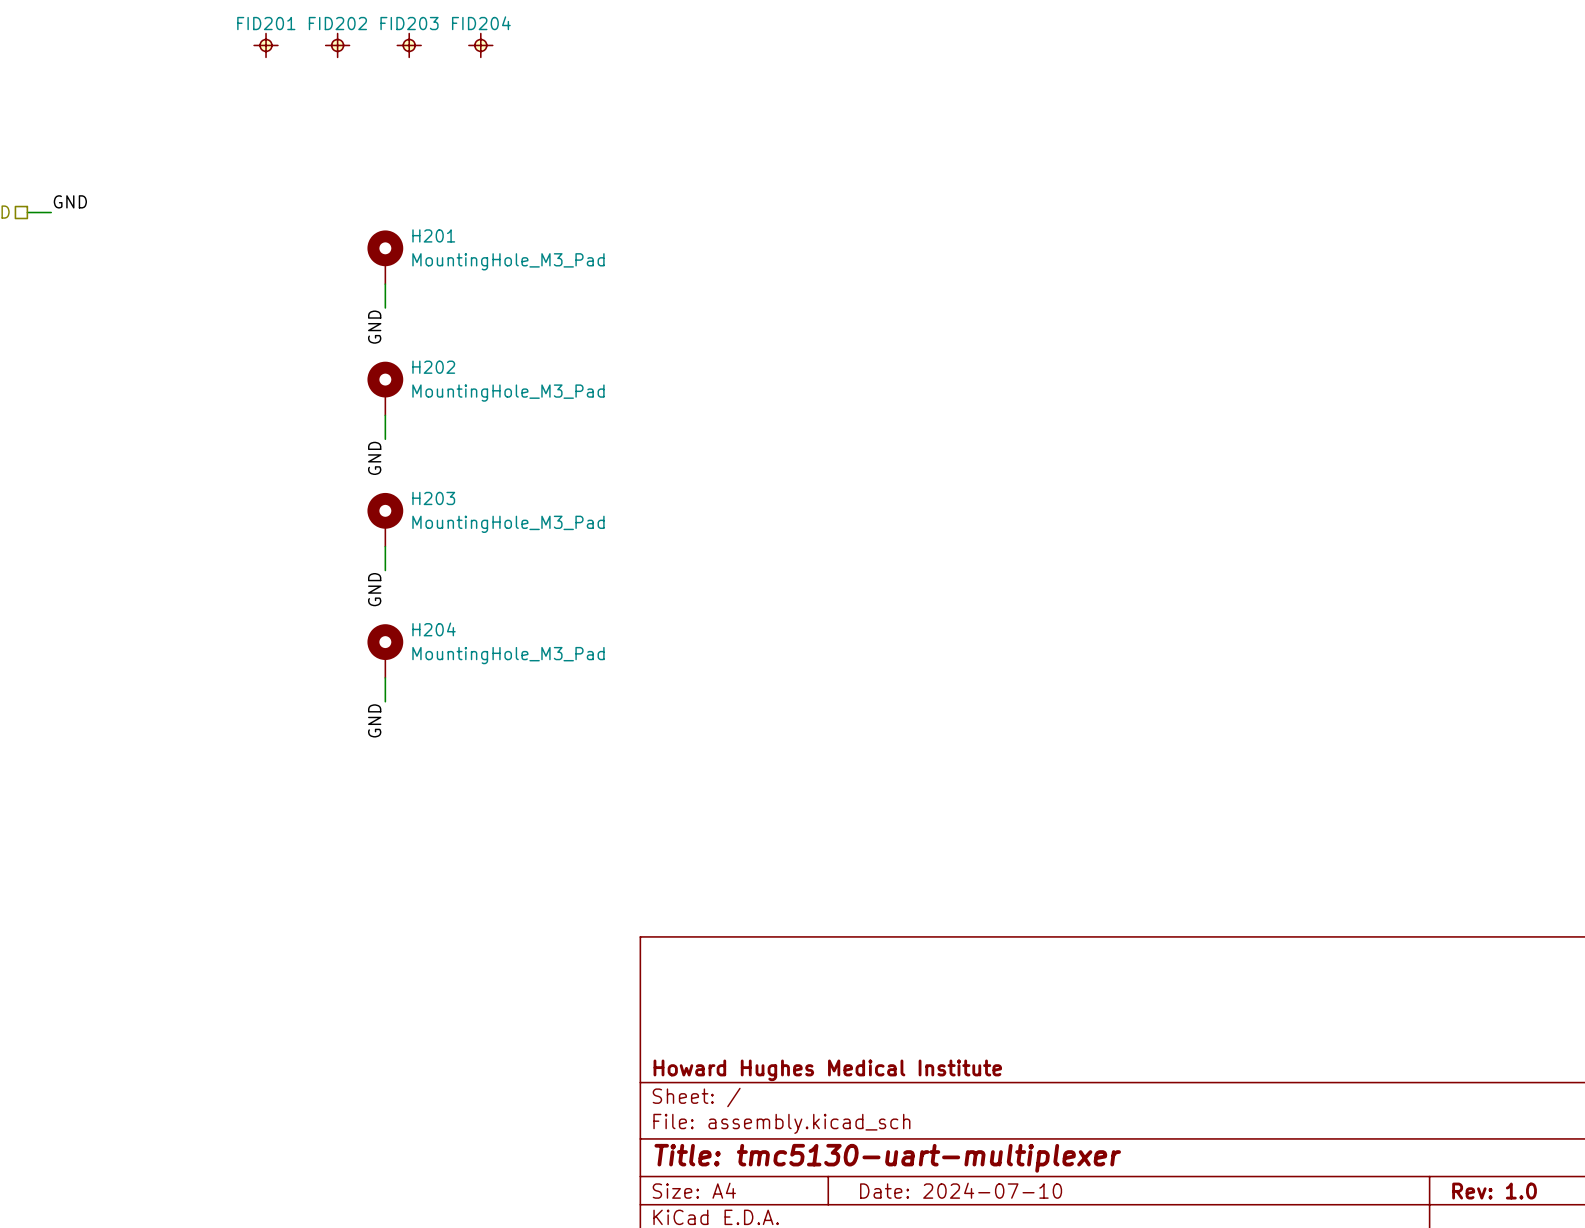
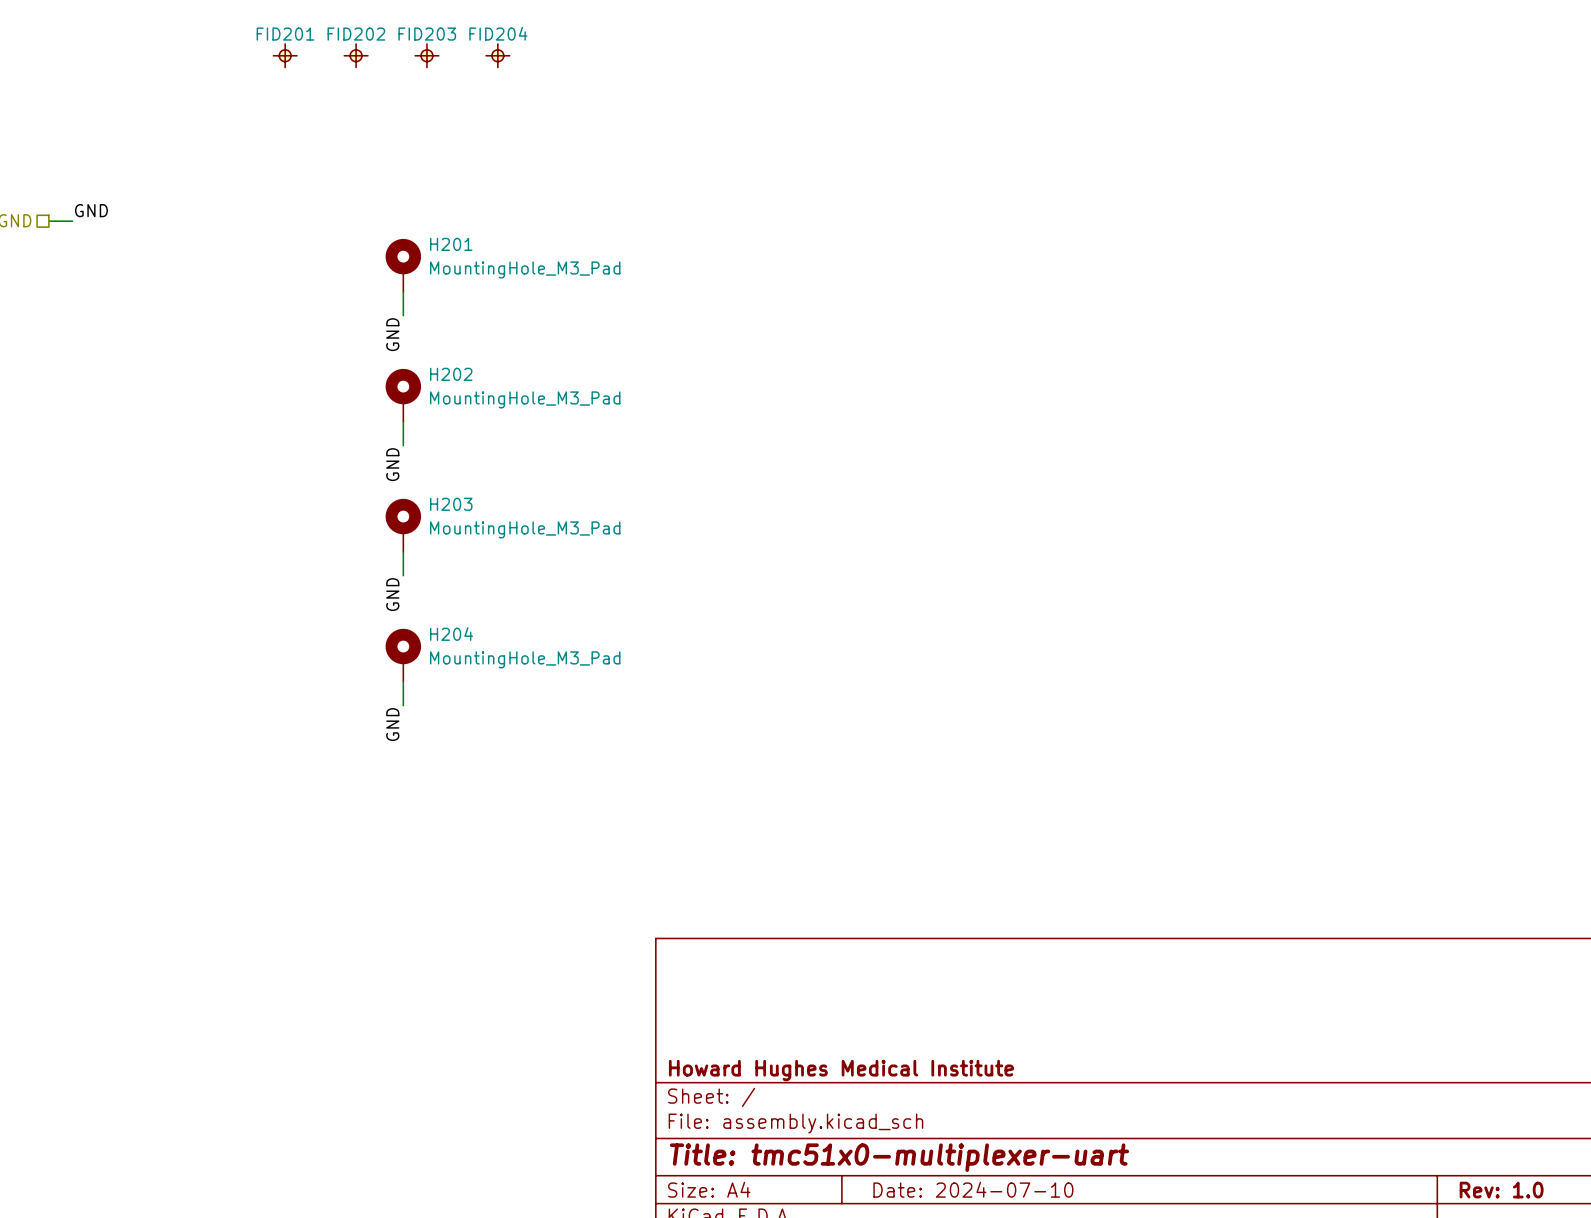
title block: Title: tmc5130-uart-multiplexer (887, 1158) -> Title: tmc51x0-multiplexer-uart (899, 1157)

